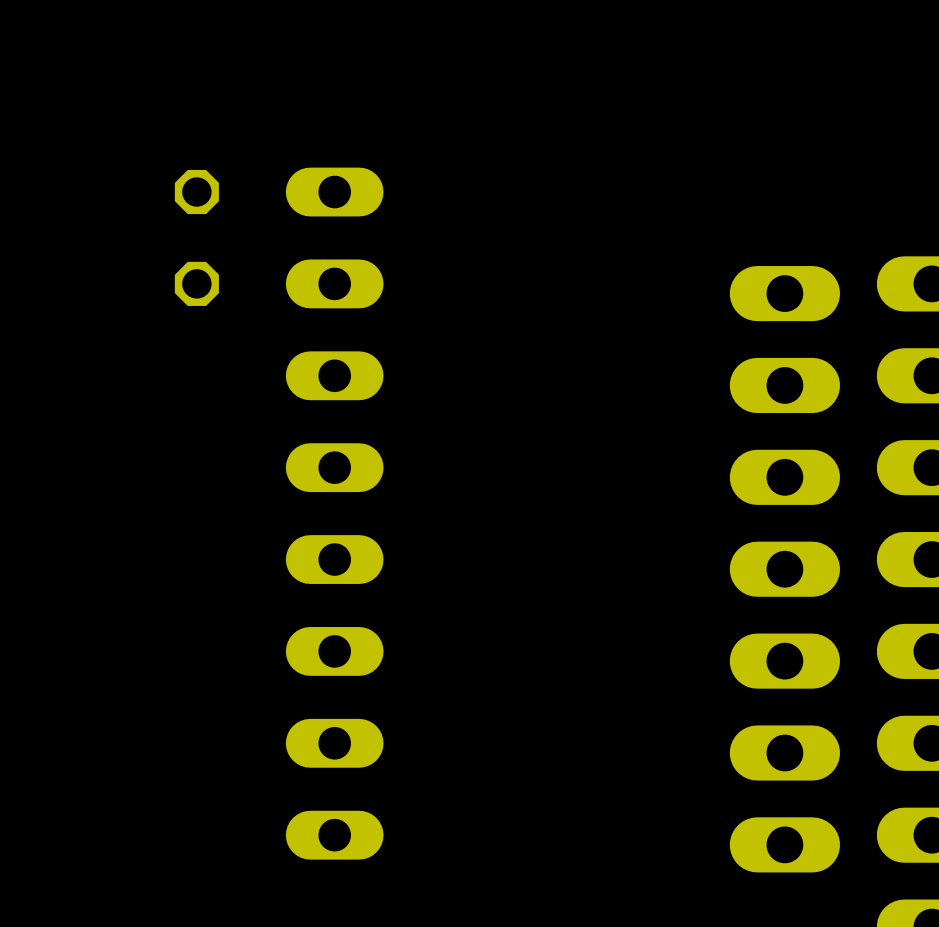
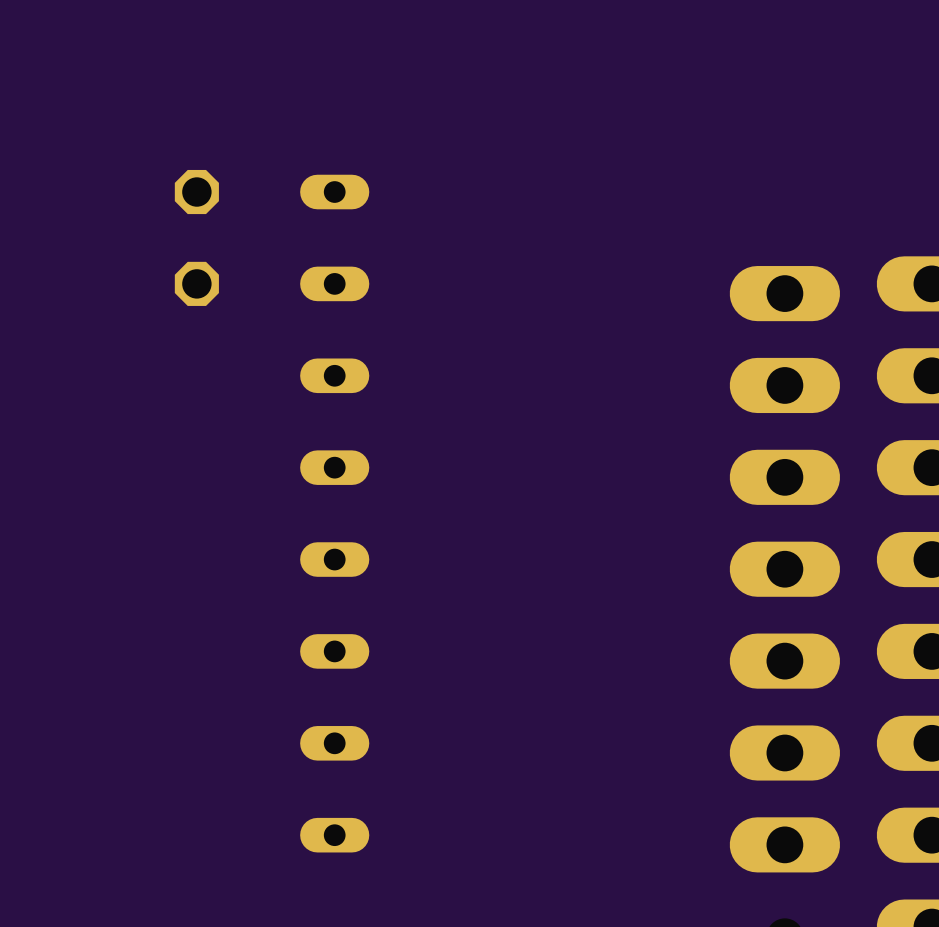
part footprint: [285, 167, 384, 860] -> [300, 174, 370, 853]

